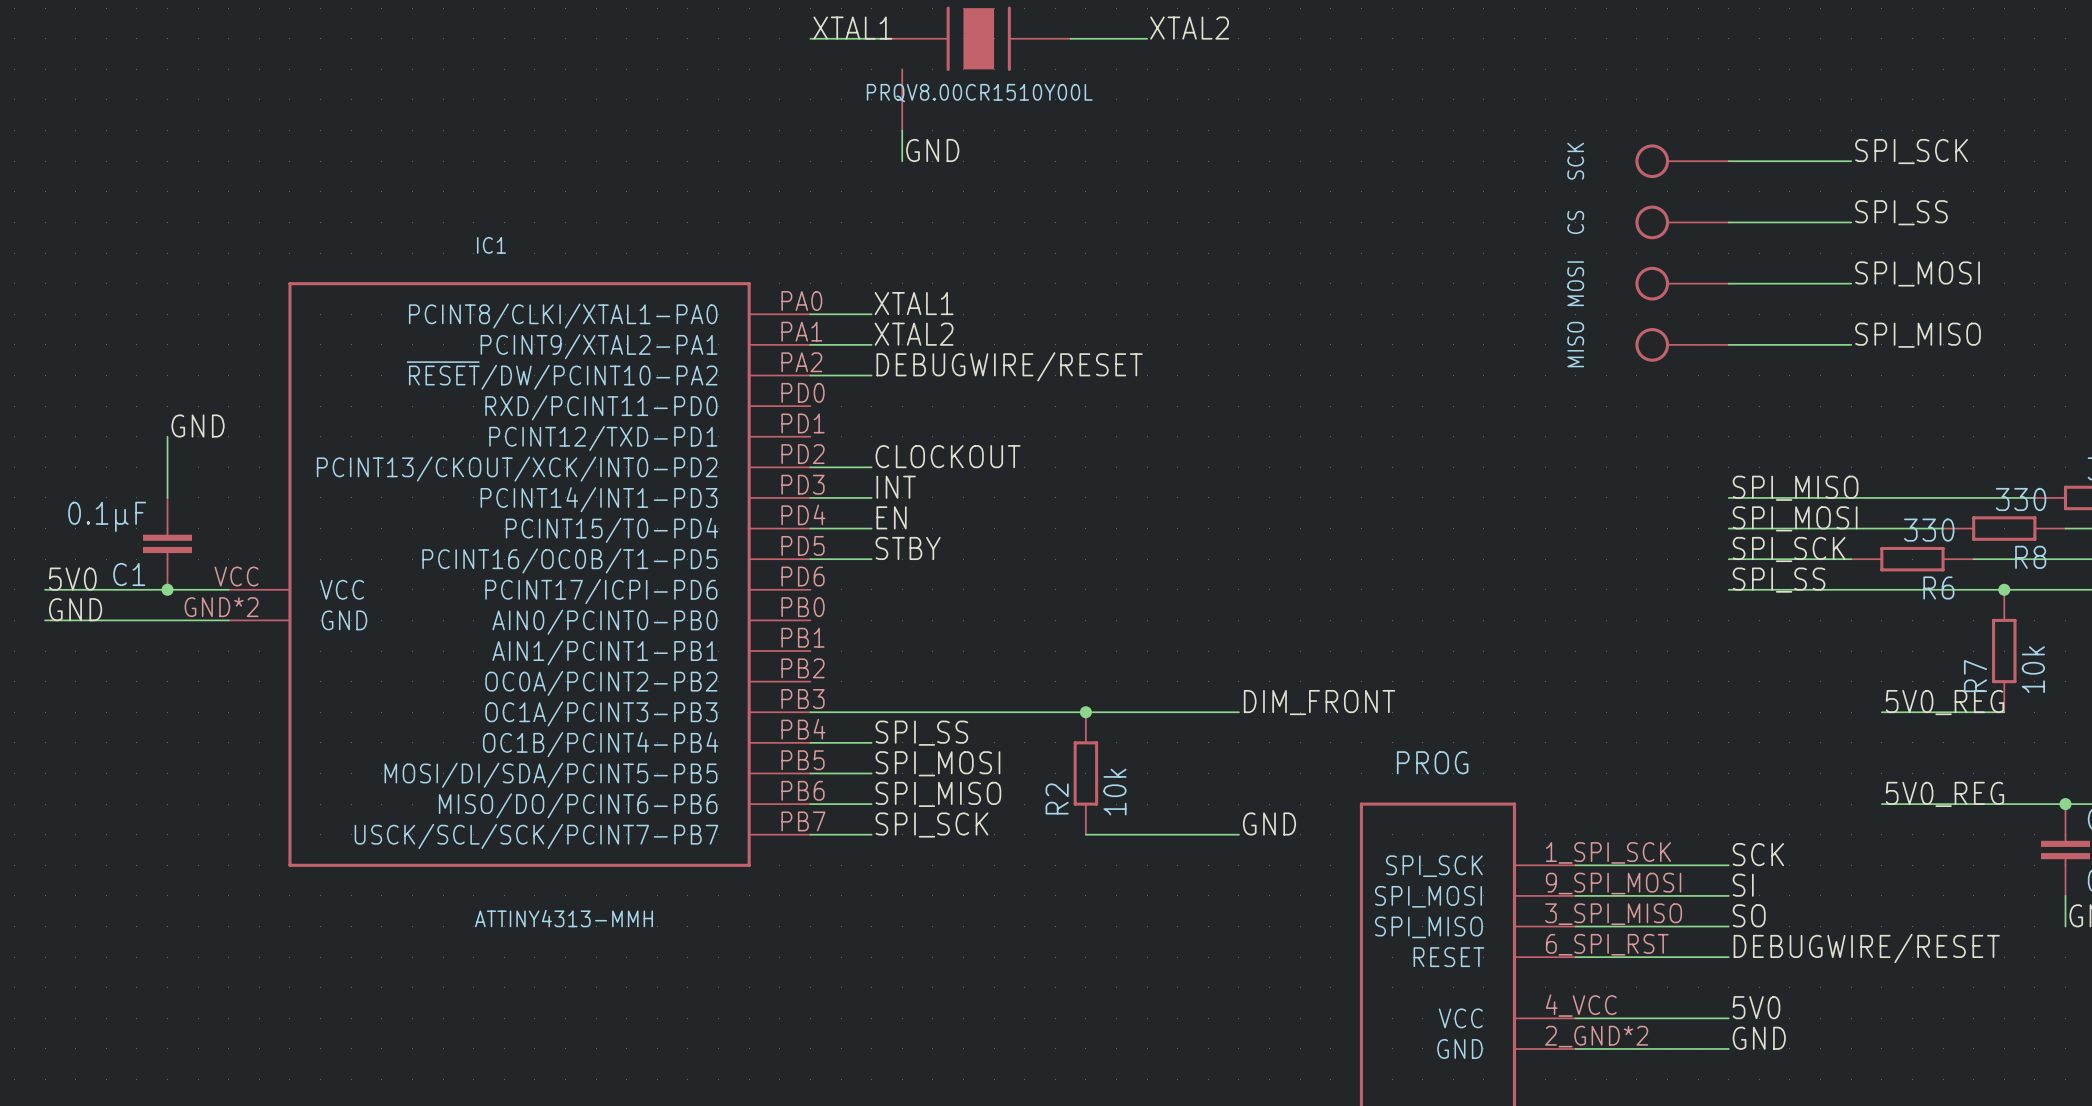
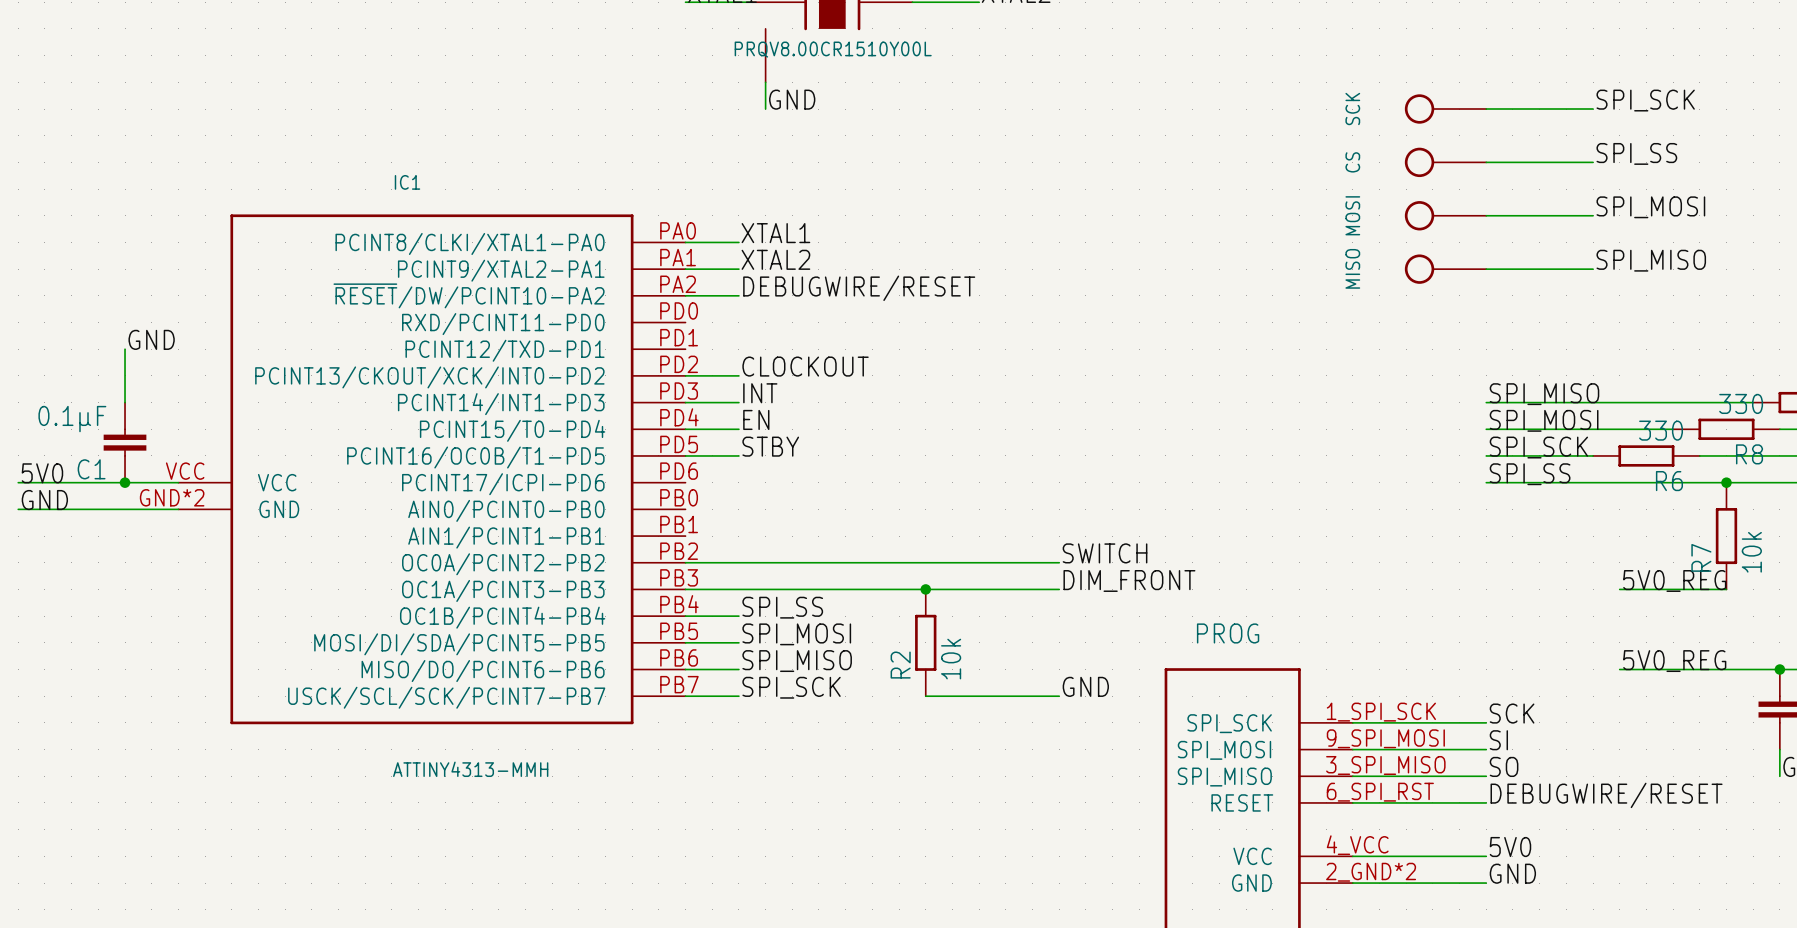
label: none -> SWITCH (1105, 553)
wire: none -> (685, 562) (1059, 562)

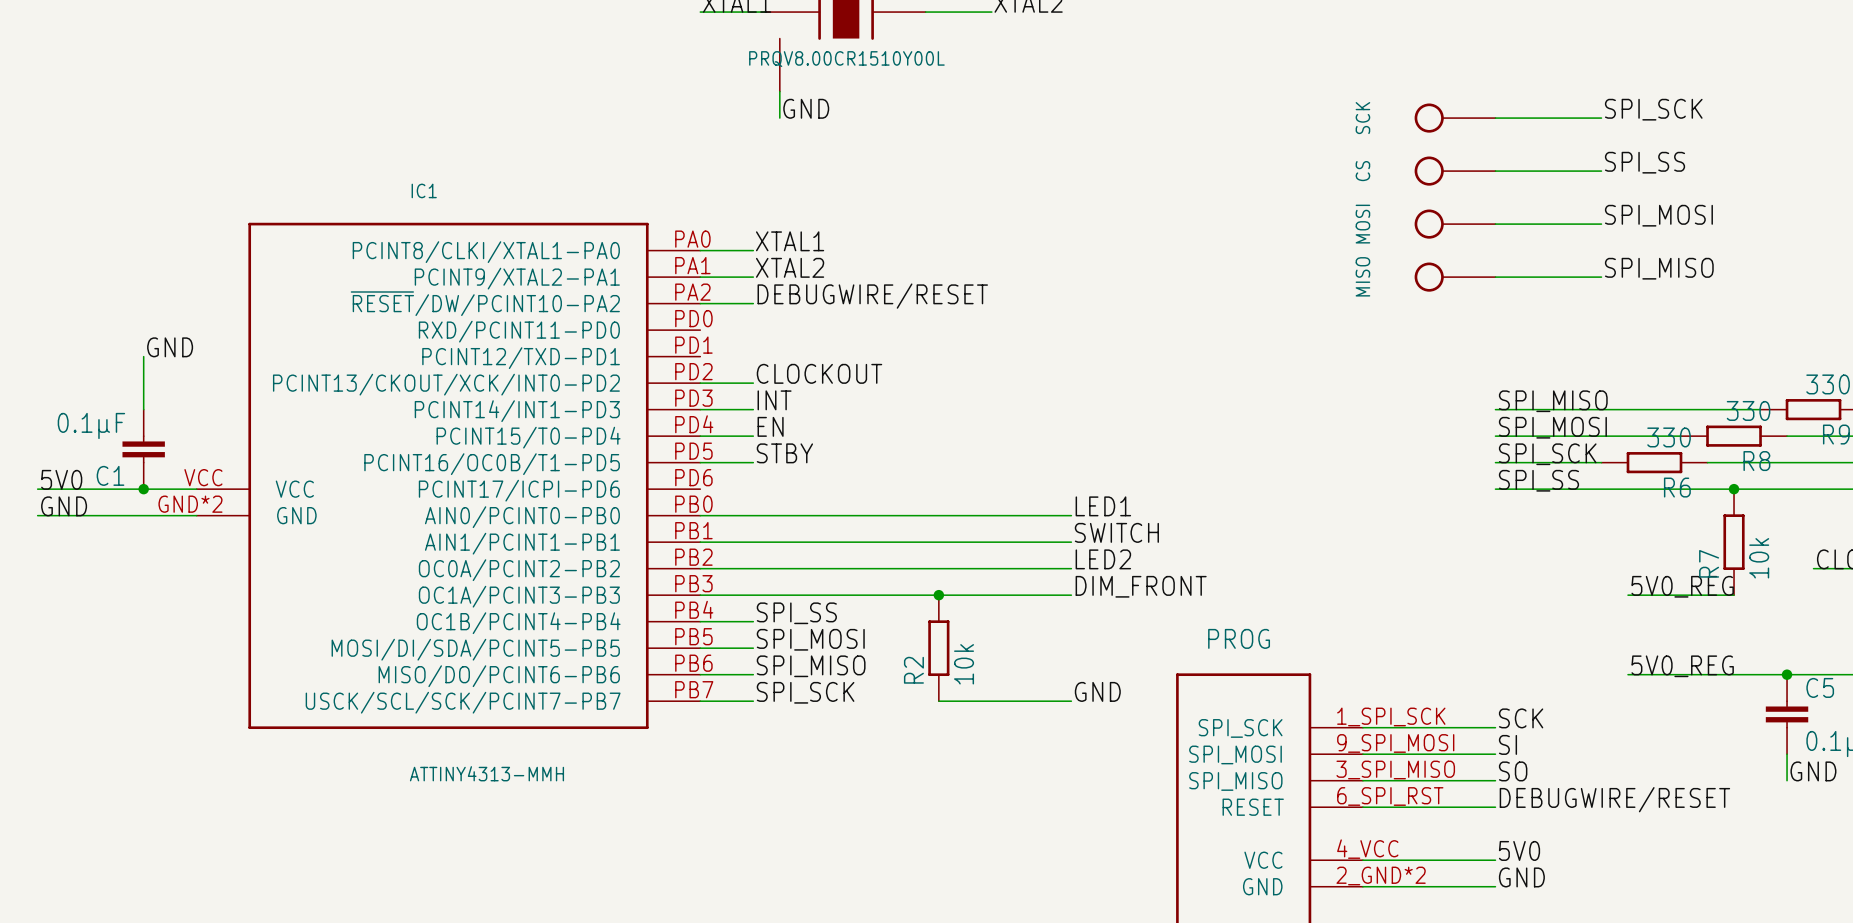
label: none -> LED1 (1103, 506)
wire: none -> (700, 515) (1071, 515)
label: none -> SWITCH (1116, 532)
wire: none -> (700, 542) (1071, 542)
label: SWITCH (1105, 553) -> LED2 (1103, 559)

